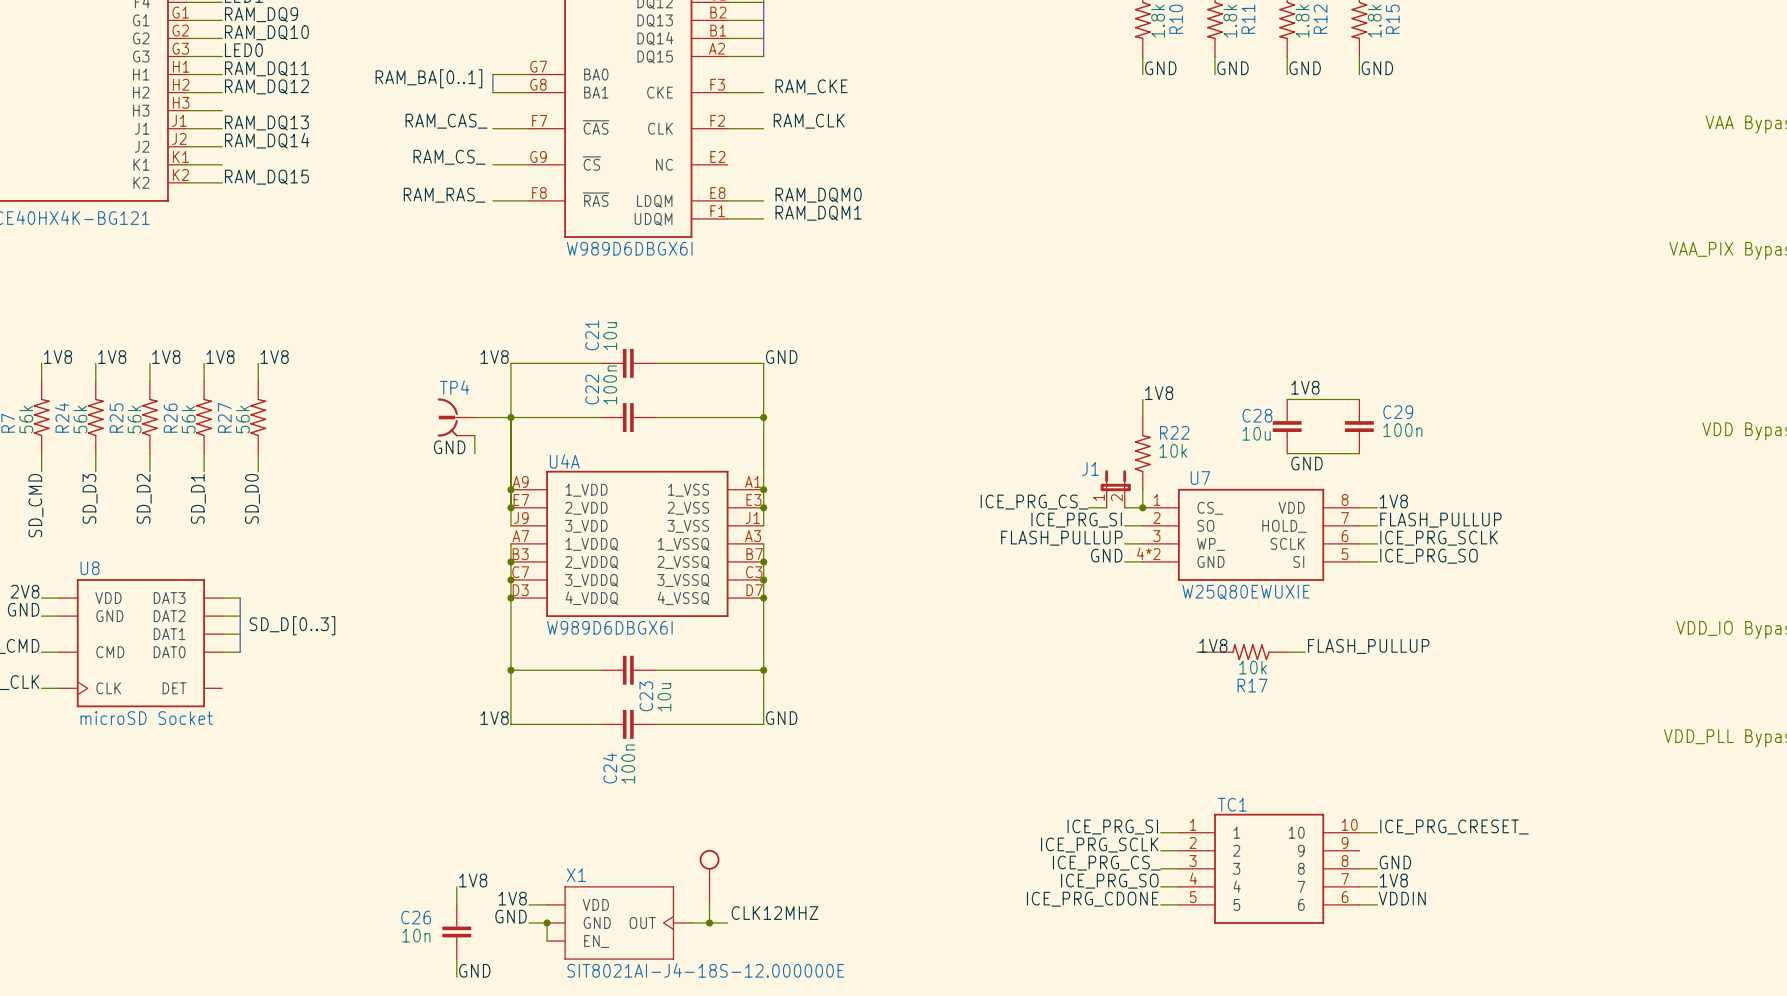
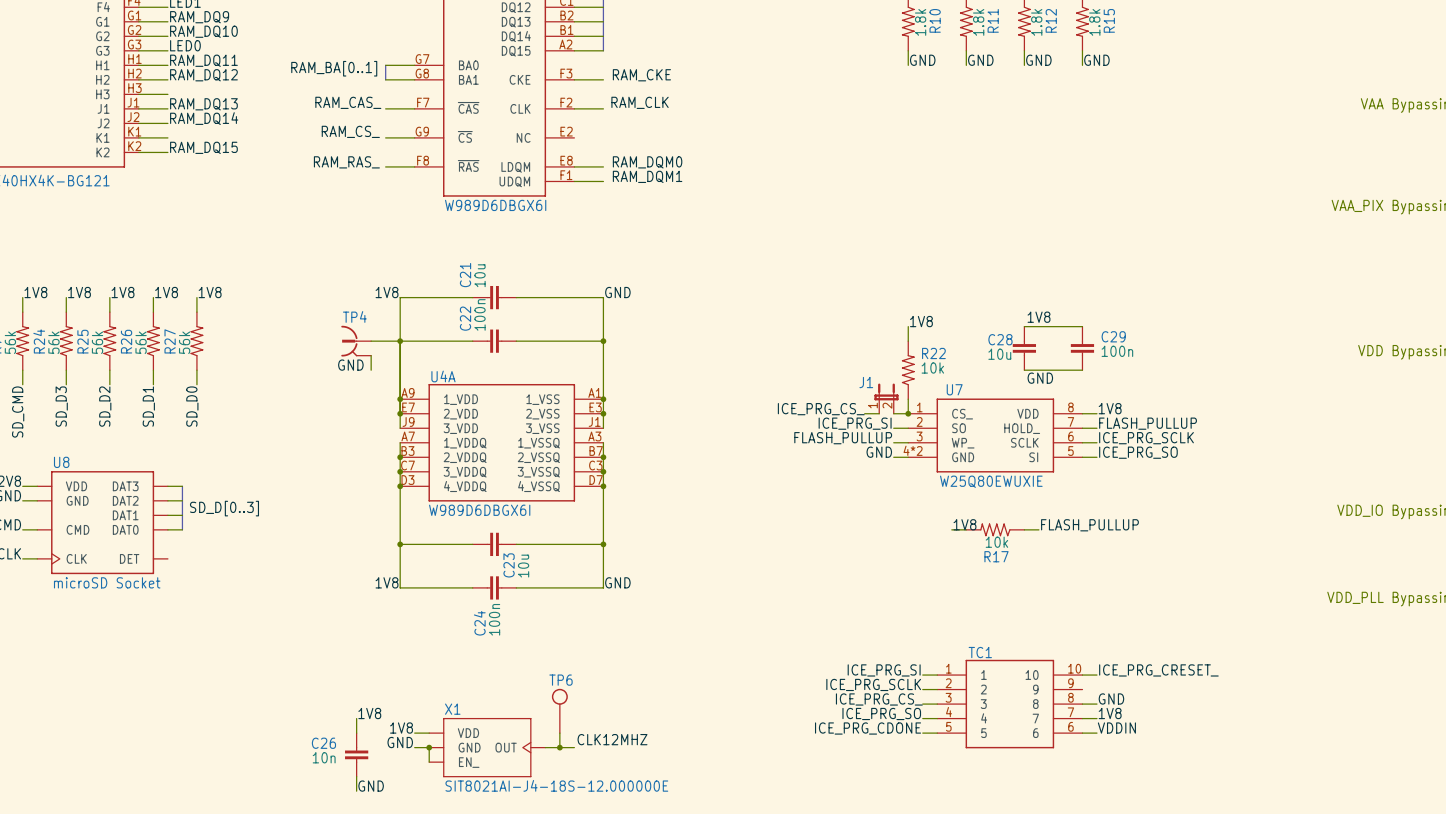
TP6 name: none -> TP6 (561, 680)

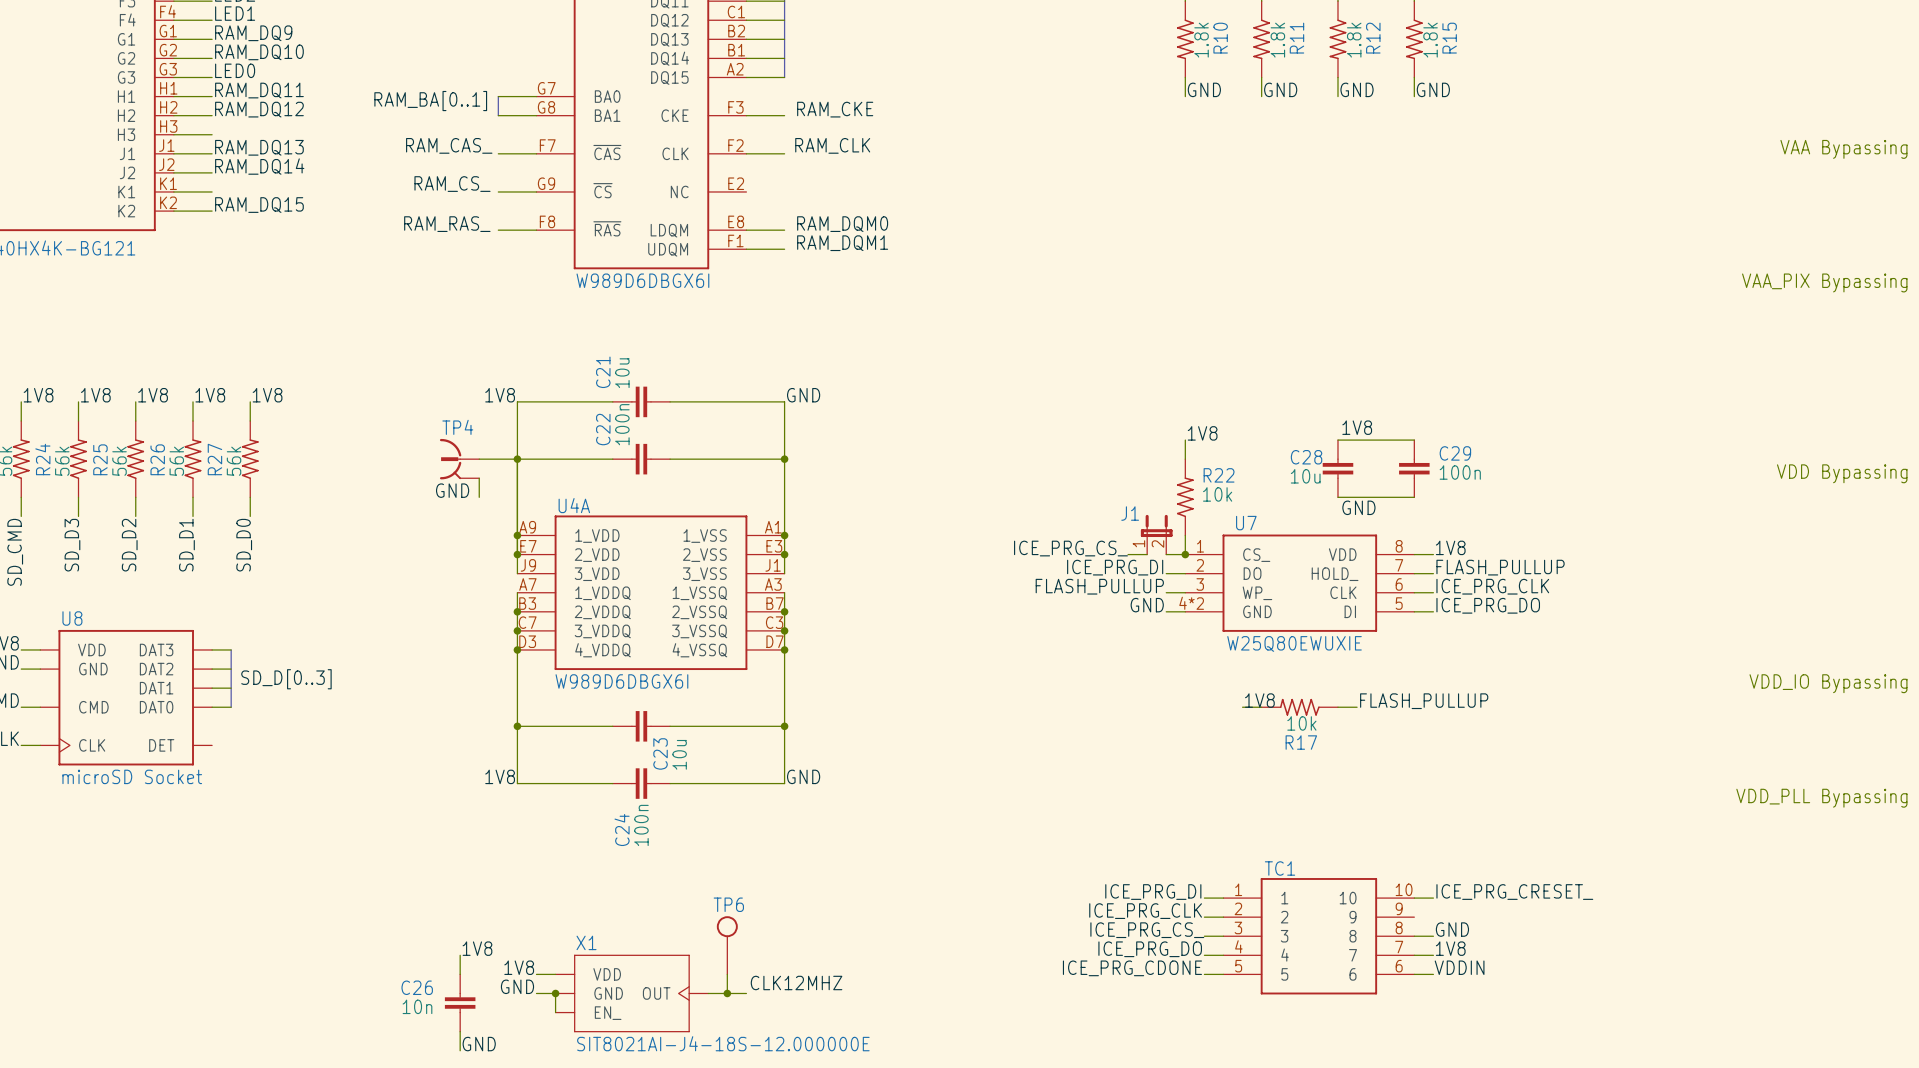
label: ICE_PRG_SI (855, 423) -> ICE_PRG_DI (1115, 567)
U7 pin name: SO (959, 428) -> DO (1252, 573)
label: ICE_PRG_SCLK (1146, 438) -> ICE_PRG_CLK (1492, 586)
U7 pin name: SCLK (1024, 442) -> CLK (1343, 592)
label: ICE_PRG_SO (1138, 452) -> ICE_PRG_DO (1488, 605)
U7 pin name: SI (1033, 457) -> DI (1350, 611)
label: ICE_PRG_SI (884, 670) -> ICE_PRG_DI (1153, 892)
label: ICE_PRG_SCLK (873, 684) -> ICE_PRG_CLK (1145, 911)
label: ICE_PRG_SO (881, 713) -> ICE_PRG_DO (1150, 949)

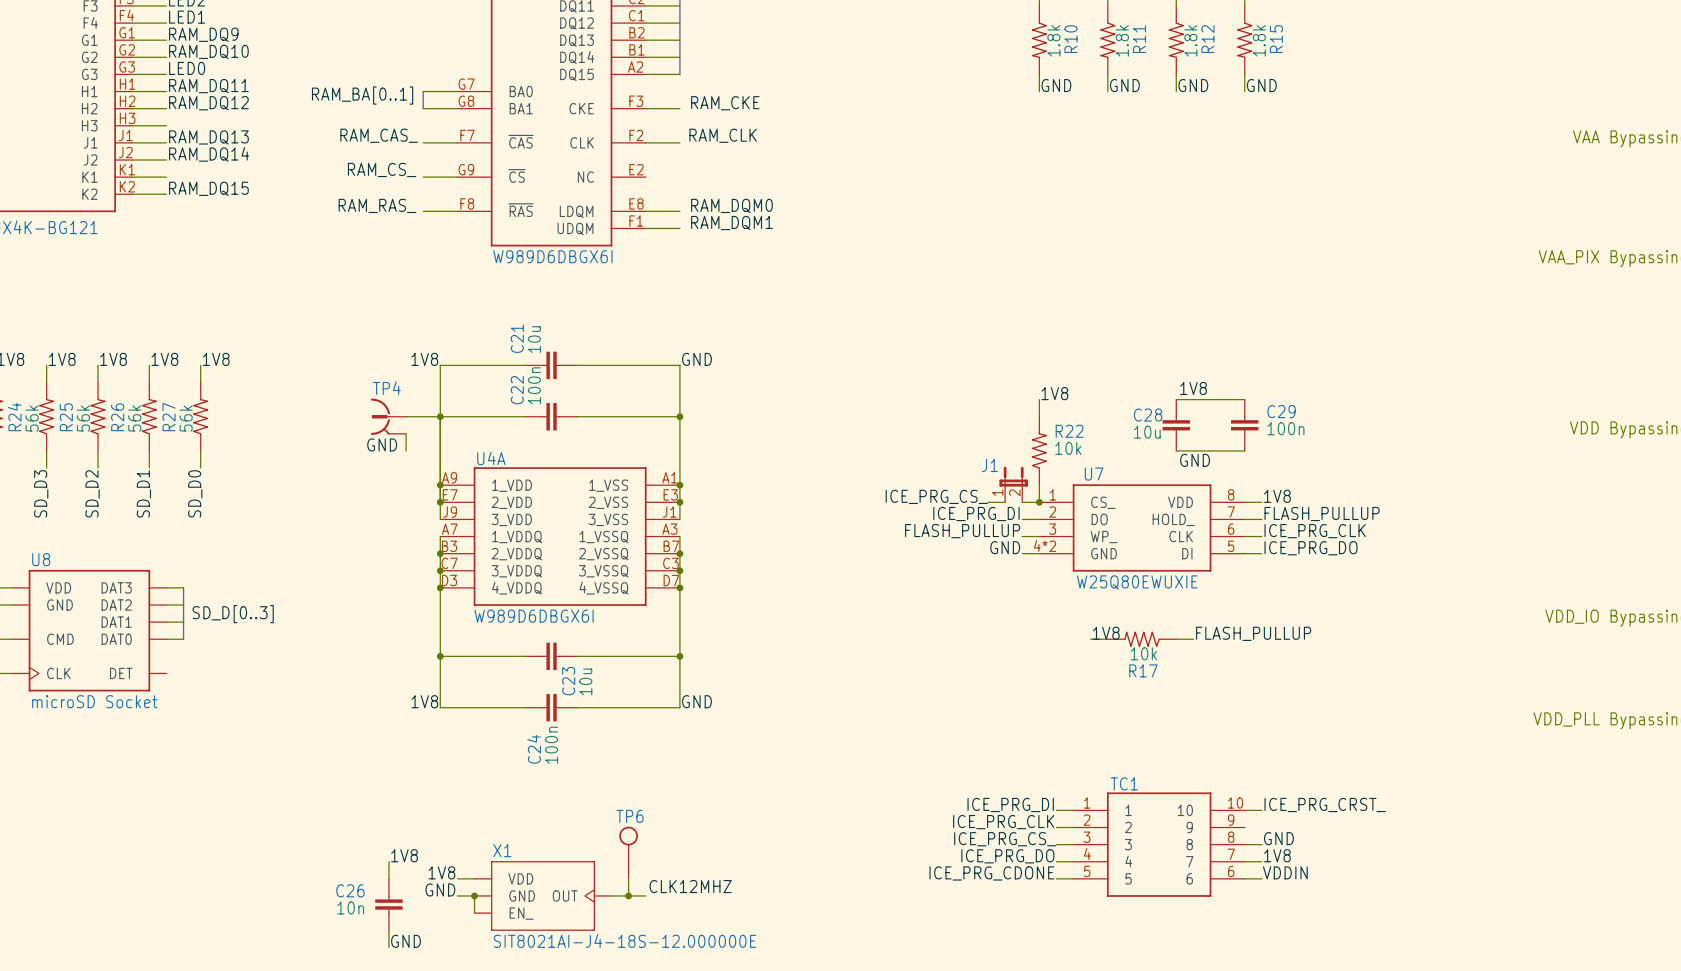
label: ICE_PRG_CRESET_ (1514, 892) -> ICE_PRG_CRST_ (1325, 804)

